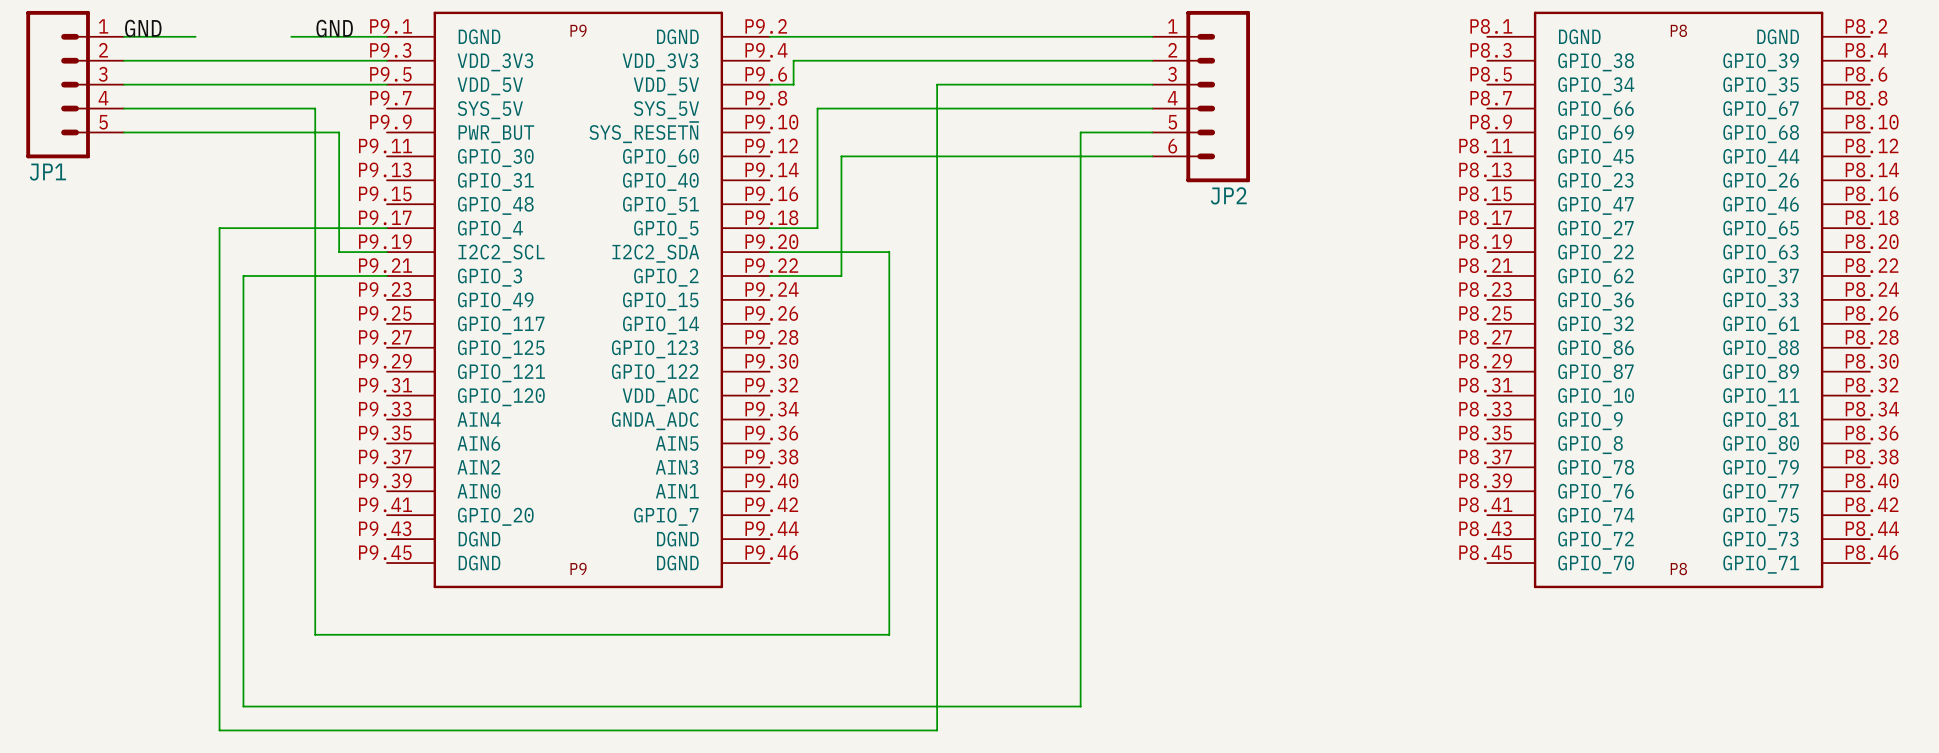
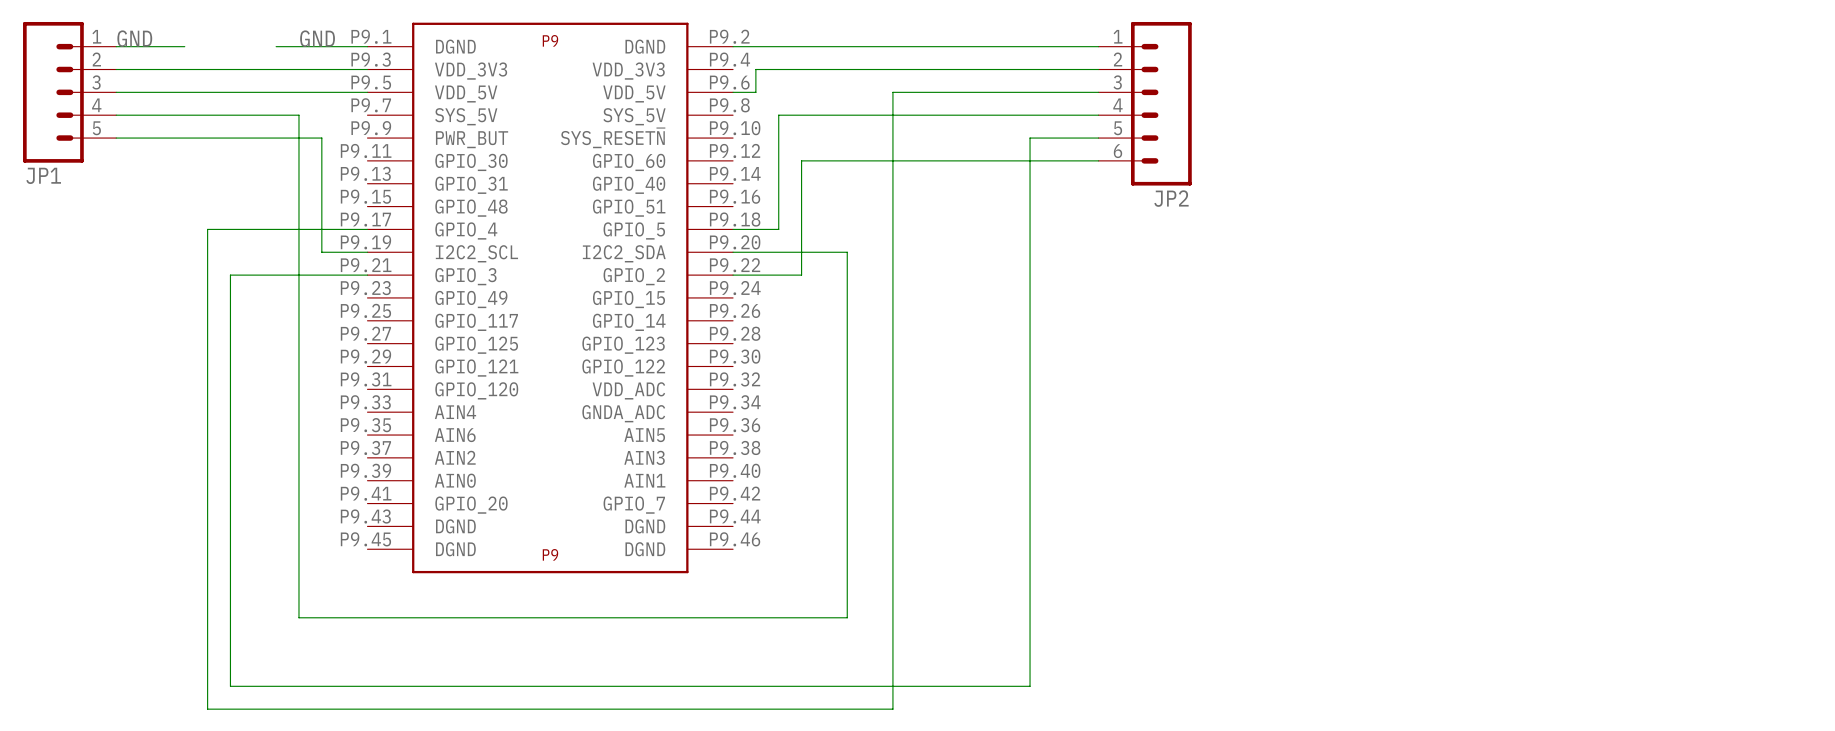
part: (1678, 299) -> none

